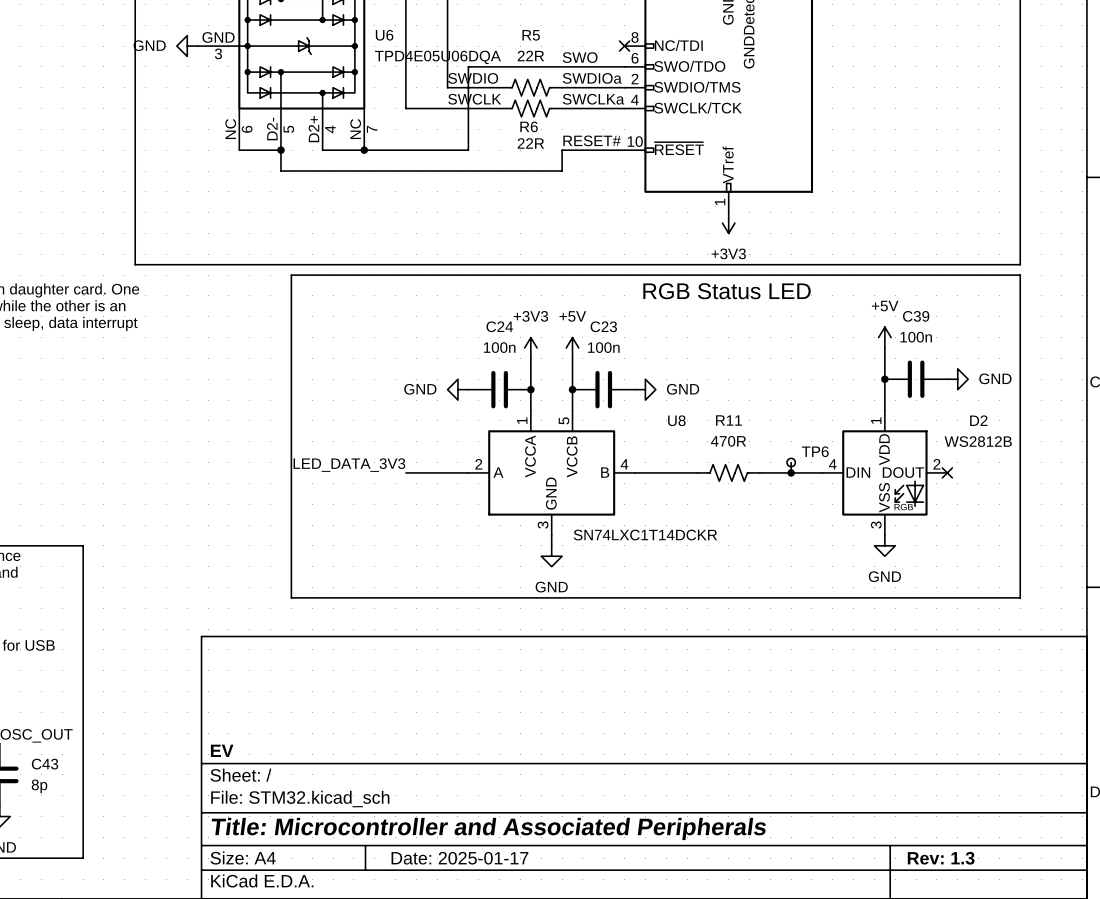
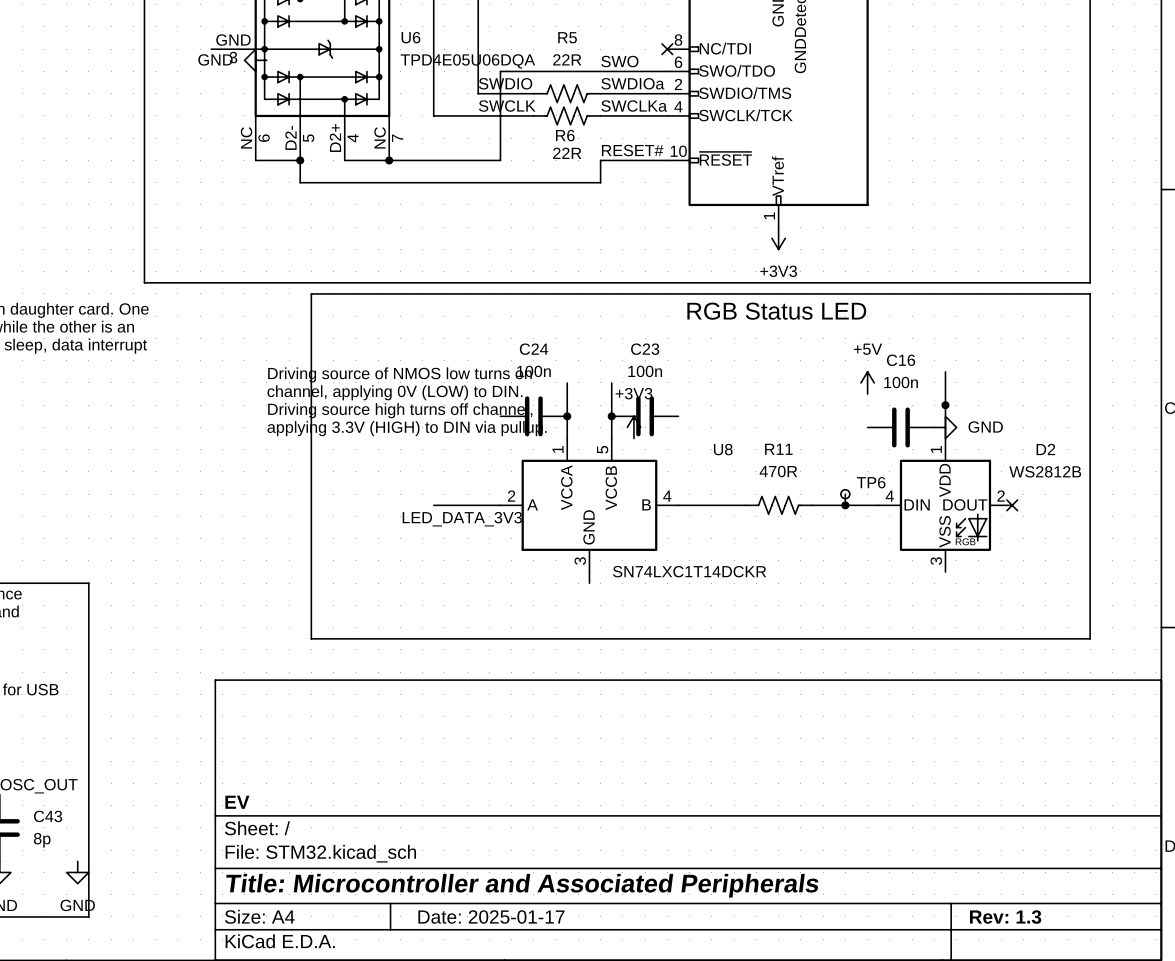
power symbol position: GND (187, 46) -> GND (255, 60)
power symbol position: +5V (884, 337) -> +5V (867, 382)
power symbol position: +3V3 (530, 348) -> +3V3 (633, 427)
power symbol: +5V (572, 348) -> none
text: none -> Driving source of NMOS low turns on (399, 374)
text: none -> channel, applying 0V (LOW) to DIN. (394, 392)
C39: 100n (916, 379) -> none
power symbol: GND (957, 379) -> none
text: none -> Driving source high turns off channel, (400, 410)
power symbol: GND (457, 389) -> none
power symbol: GND (645, 389) -> none
C16: none -> 100n (900, 427)
power symbol: none -> GND (945, 427)
text: none -> applying 3.3V (HIGH) to DIN via pullup. (407, 428)
label position: LED_DATA_3V3 (349, 465) -> LED_DATA_3V3 (462, 519)
power symbol: GND (884, 545) -> none
power symbol: GND (551, 556) -> none
power symbol: none -> GND (77, 872)

